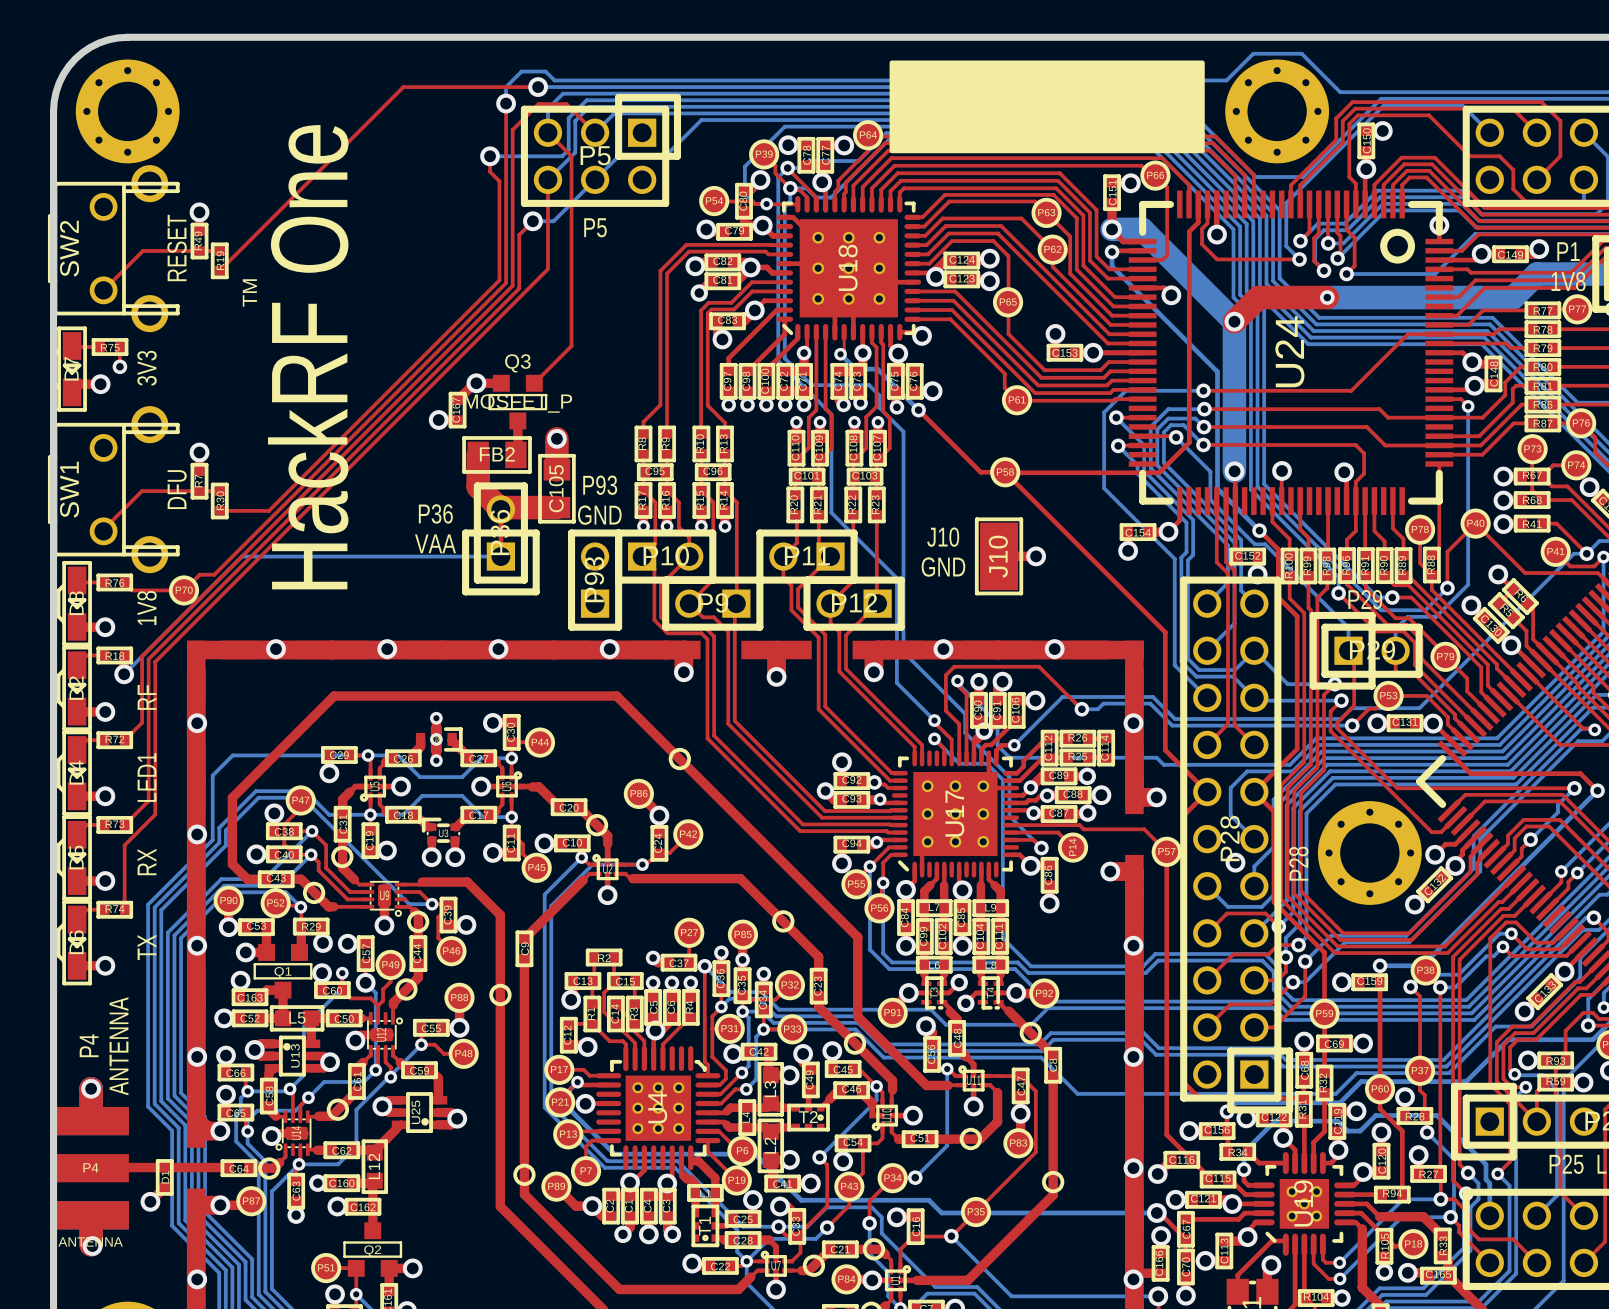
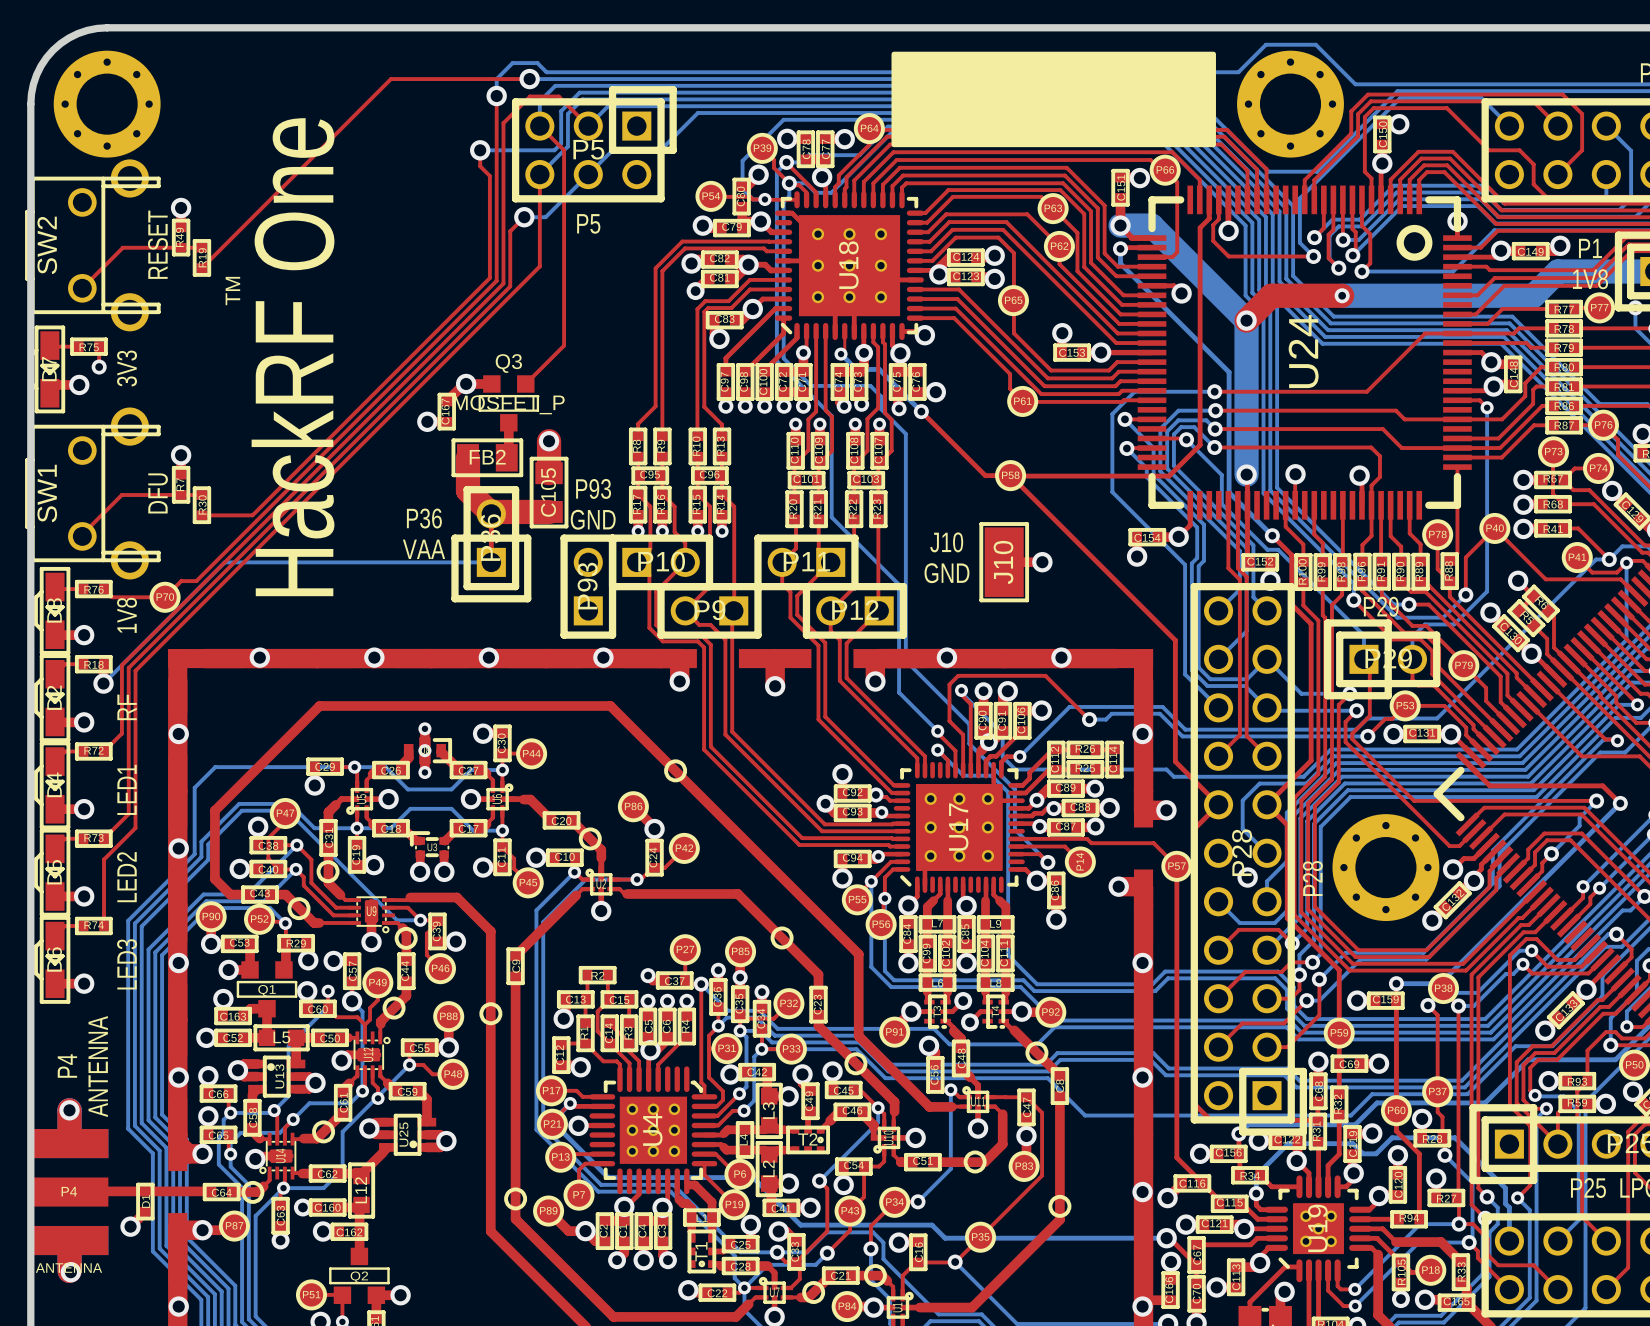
text: RX (147, 862) -> LED2 (126, 877)
text: TX (147, 947) -> LED3 (127, 964)

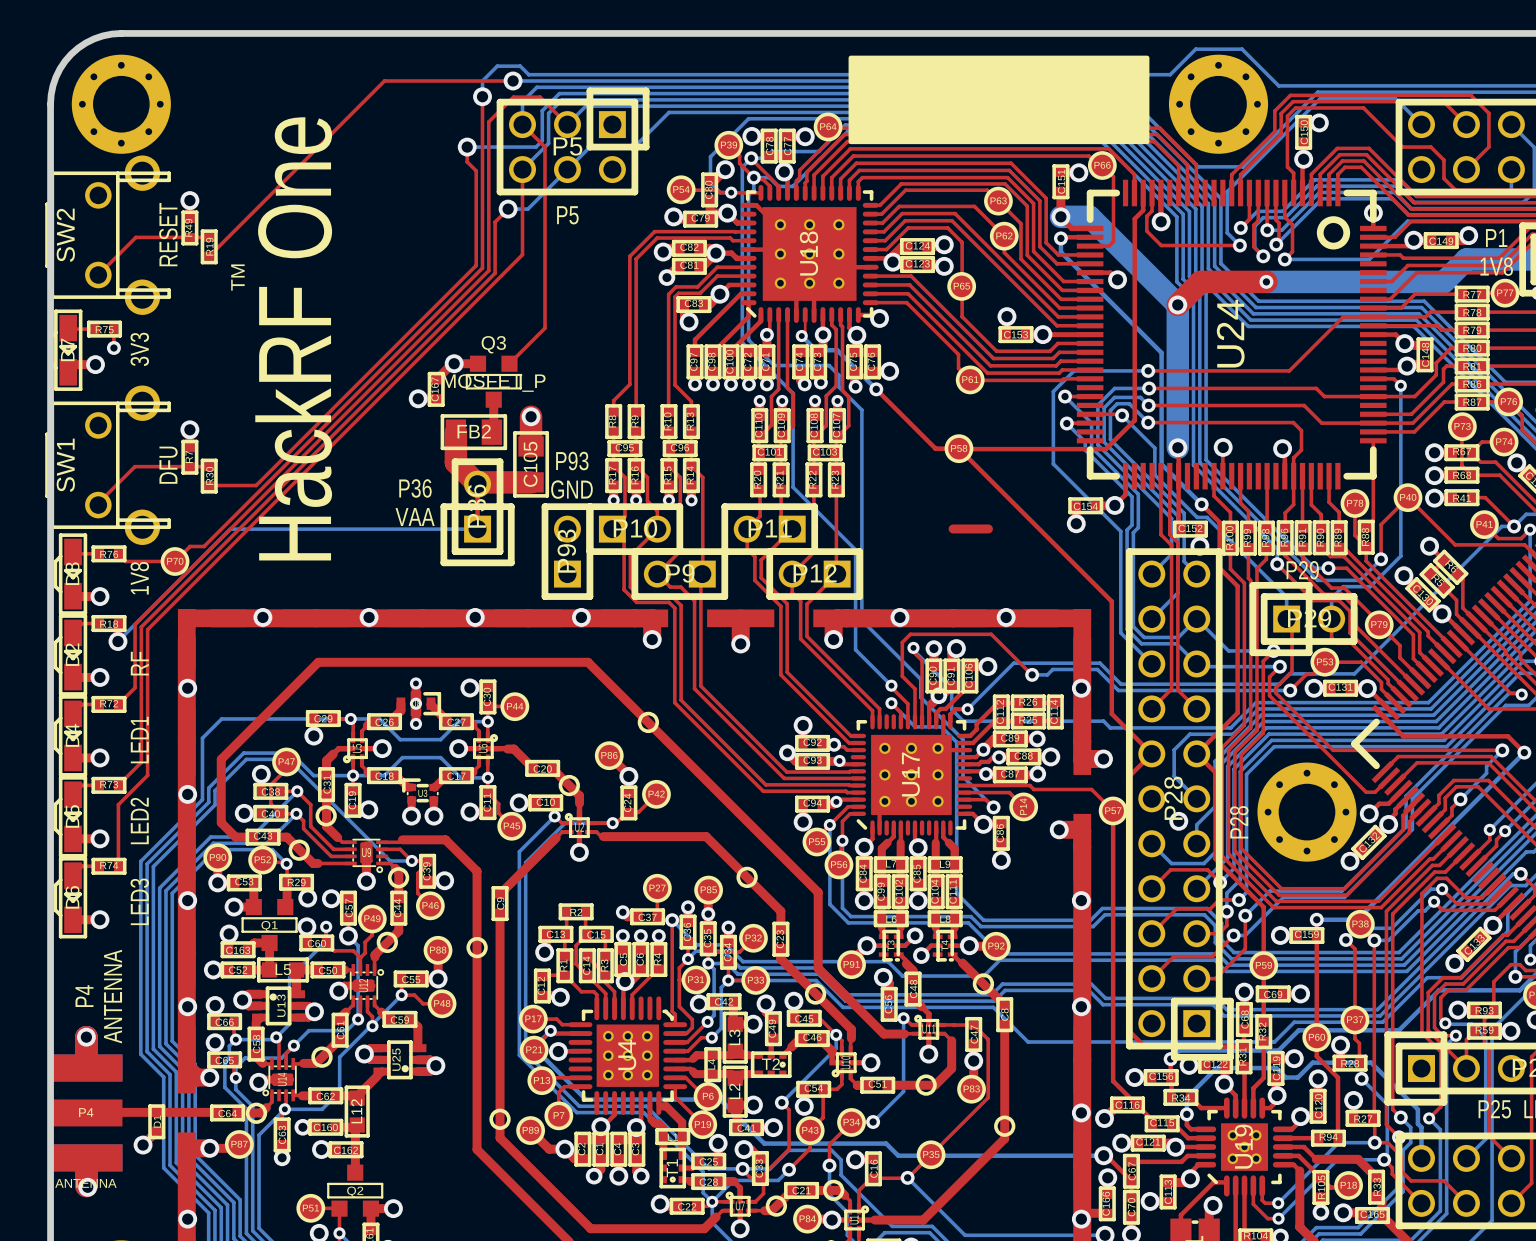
text: J10 (946, 542) -> none
J10: (1004, 562) -> none
via: (1042, 562) -> none
text: GND (946, 573) -> none

